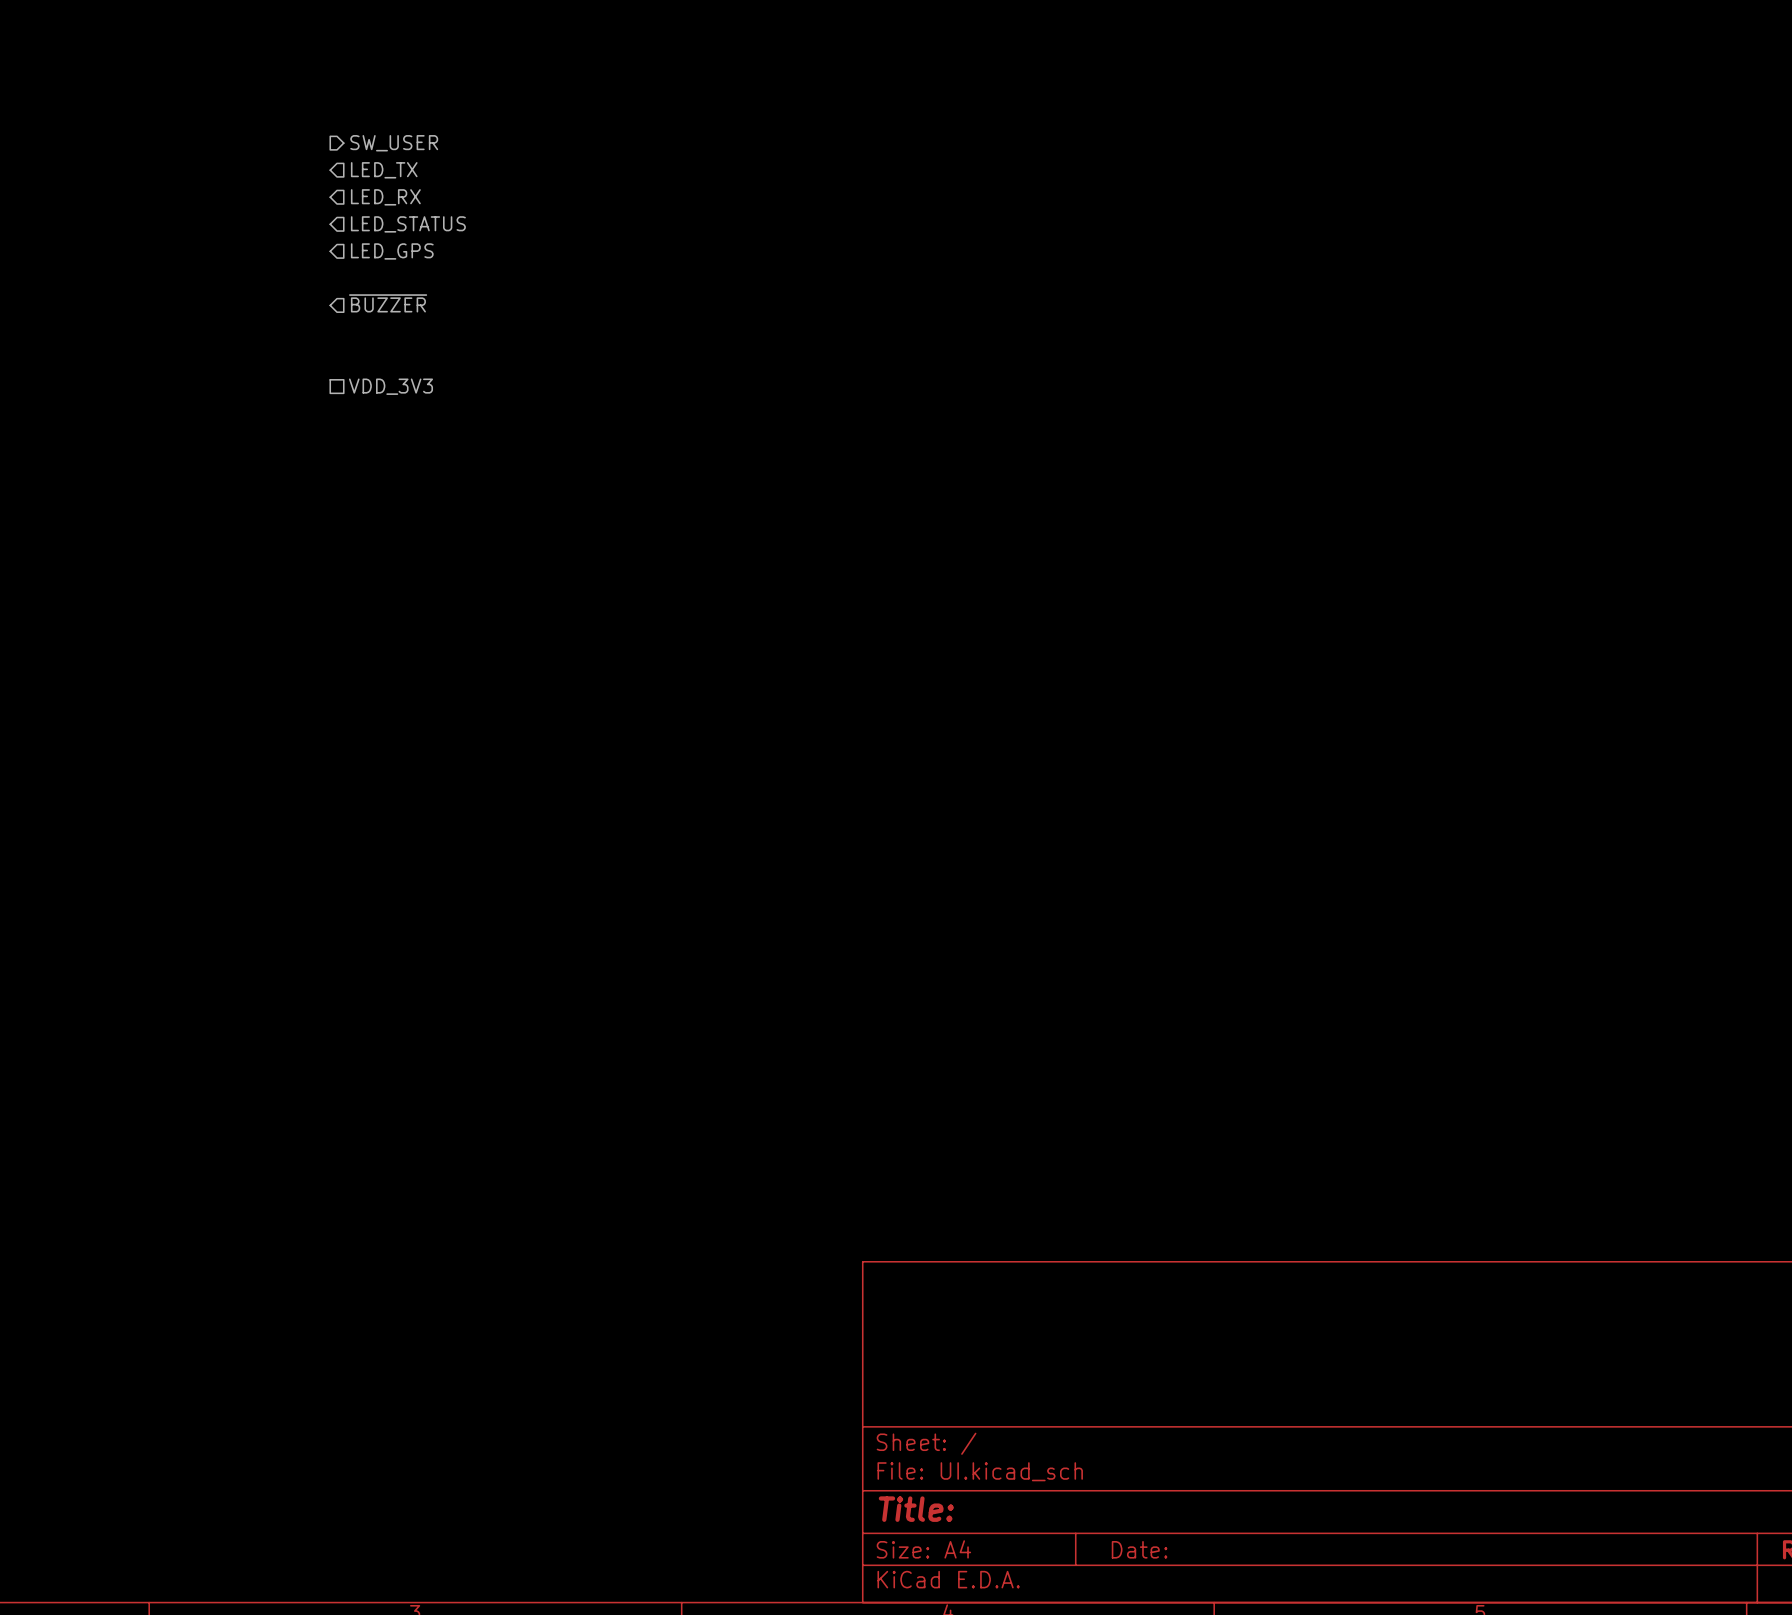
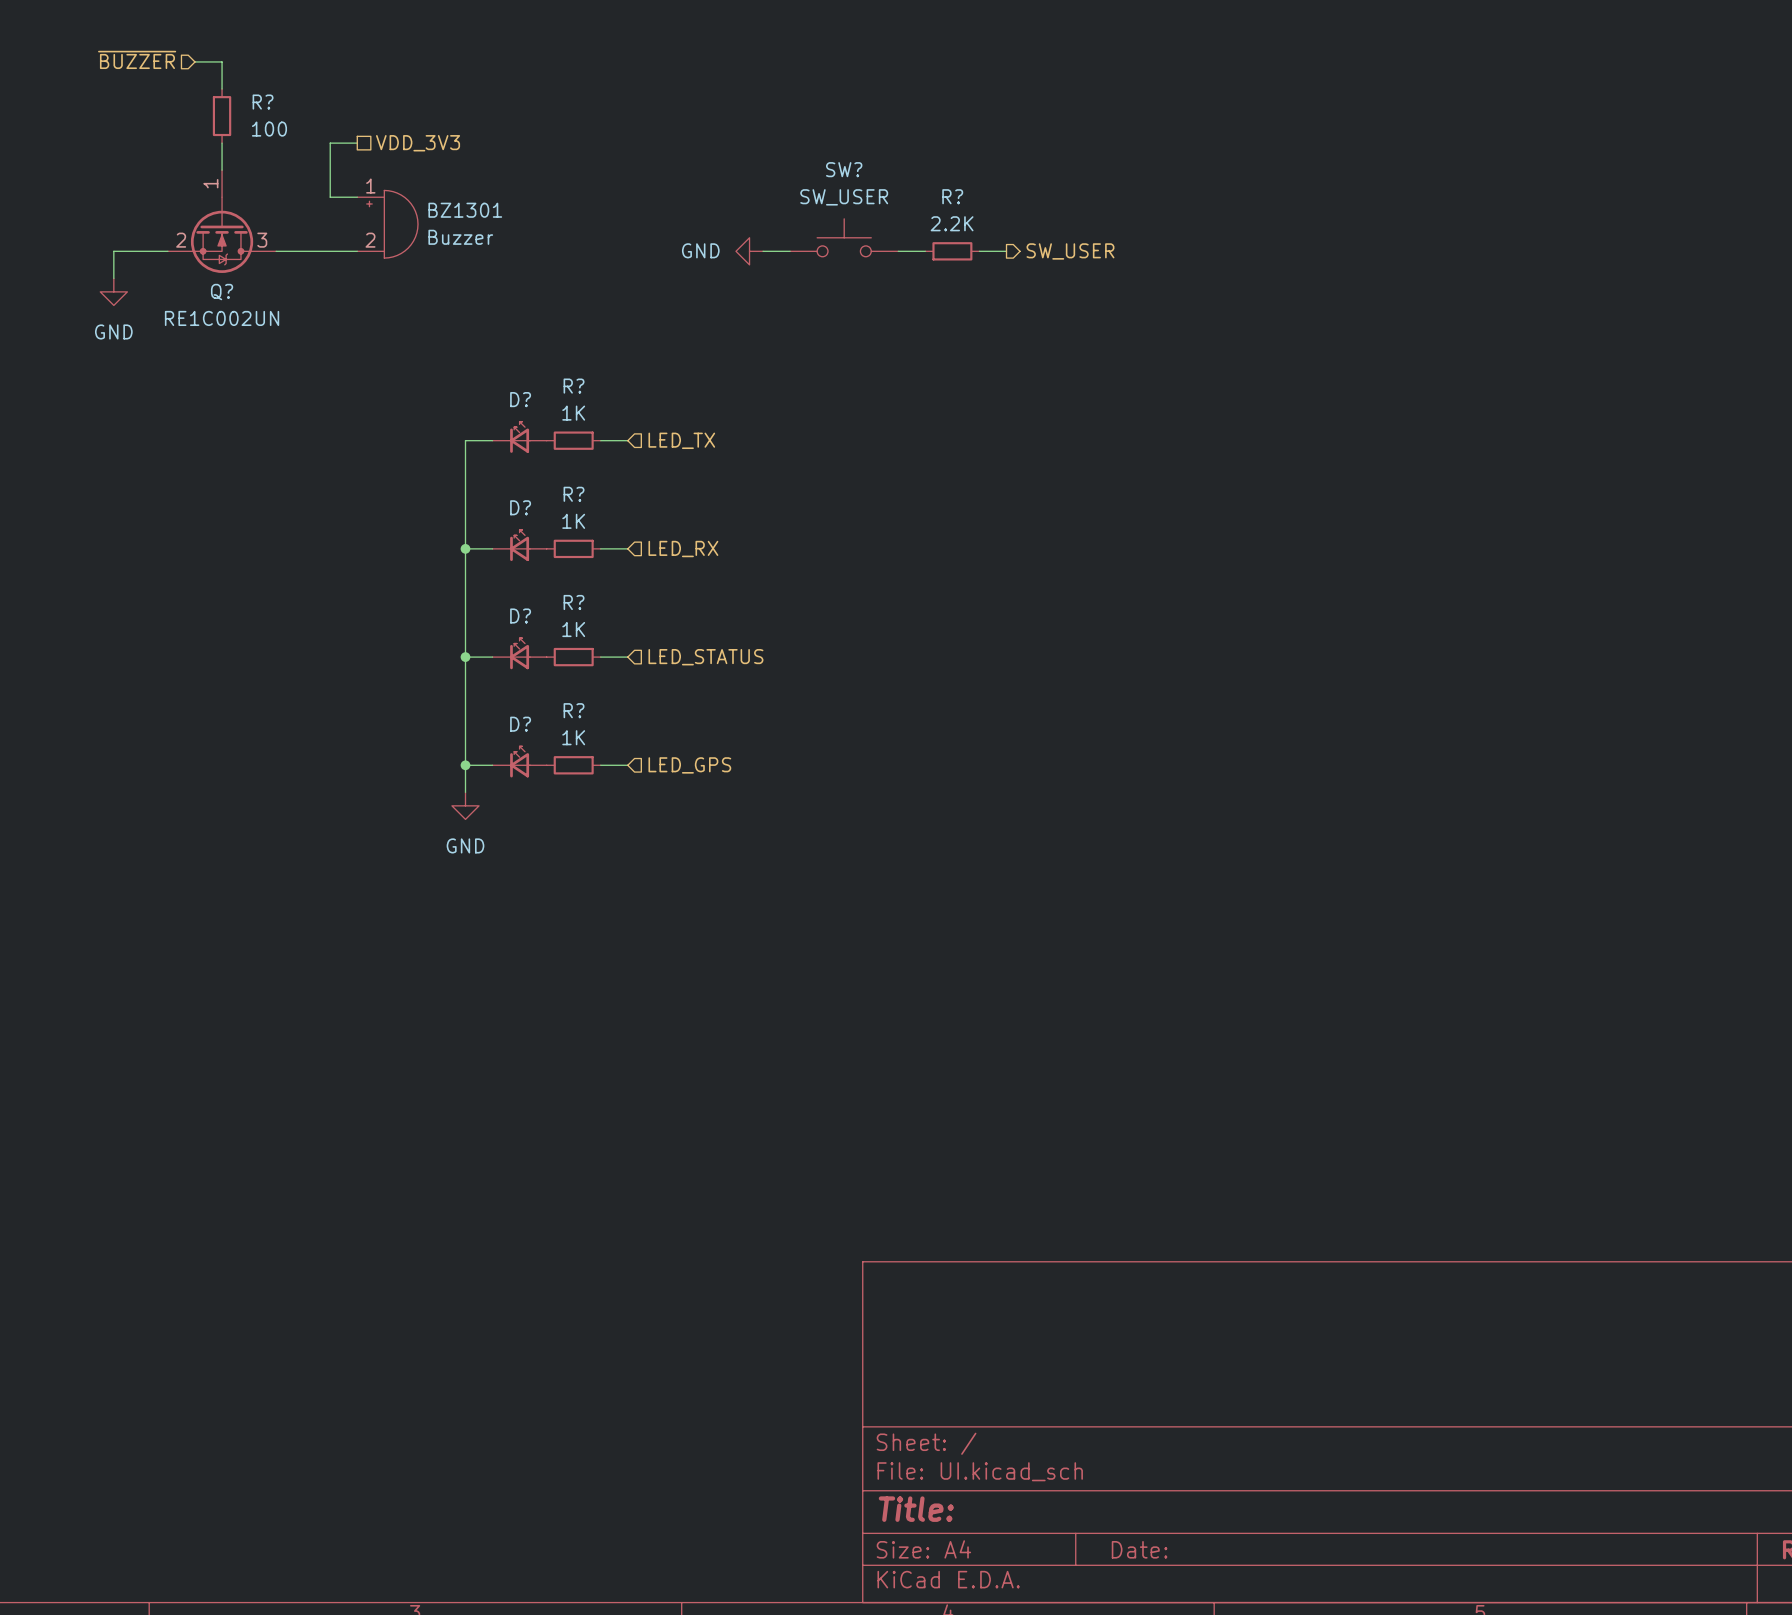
hierarchical label: none -> ~{BUZZER} (137, 59)
wire: none -> (194, 61) (222, 61) (222, 89)
R?: none -> 100 (222, 116)
wire: none -> (222, 143) (222, 170)
wire: none -> (357, 143) (330, 143) (330, 197) (357, 197)
hierarchical label: SW_USER (394, 143) -> none
hierarchical label: LED_TX (384, 170) -> none
hierarchical label: LED_RX (385, 197) -> none
Q?: none -> RE1C002UN (222, 221)
BZ1301: none -> Buzzer (387, 224)
hierarchical label: LED_STATUS (408, 224) -> none
SW?: none -> SW_USER (844, 237)
wire: none -> (167, 251) (113, 251) (113, 278)
wire: none -> (276, 251) (357, 251)
hierarchical label: LED_GPS (392, 251) -> none
power symbol: none -> GND (749, 251)
wire: none -> (763, 251) (790, 251)
wire: none -> (898, 251) (925, 251)
R?: none -> 2.2K (952, 251)
wire: none -> (979, 251) (1006, 251)
hierarchical label: none -> SW_USER (1070, 251)
power symbol: none -> GND (113, 291)
hierarchical label: ~{BUZZER} (388, 303) -> none
hierarchical label position: VDD_3V3 (390, 386) -> VDD_3V3 (418, 143)
D?: none -> (519, 437)
wire: none -> (492, 440) (465, 440) (465, 792)
R?: none -> 1K (573, 440)
wire: none -> (600, 440) (627, 440)
hierarchical label: none -> LED_TX (681, 440)
D?: none -> (519, 545)
wire: none -> (465, 548) (492, 548)
junction: none -> (465, 548)
R?: none -> 1K (573, 548)
wire: none -> (600, 548) (627, 548)
hierarchical label: none -> LED_RX (683, 549)
D?: none -> (519, 653)
wire: none -> (465, 657) (492, 657)
junction: none -> (465, 657)
R?: none -> 1K (573, 657)
wire: none -> (600, 657) (627, 657)
hierarchical label: none -> LED_STATUS (705, 657)
D?: none -> (519, 761)
wire: none -> (465, 765) (492, 765)
junction: none -> (465, 765)
R?: none -> 1K (573, 765)
wire: none -> (600, 765) (627, 765)
hierarchical label: none -> LED_GPS (689, 765)
power symbol: none -> GND (465, 805)

